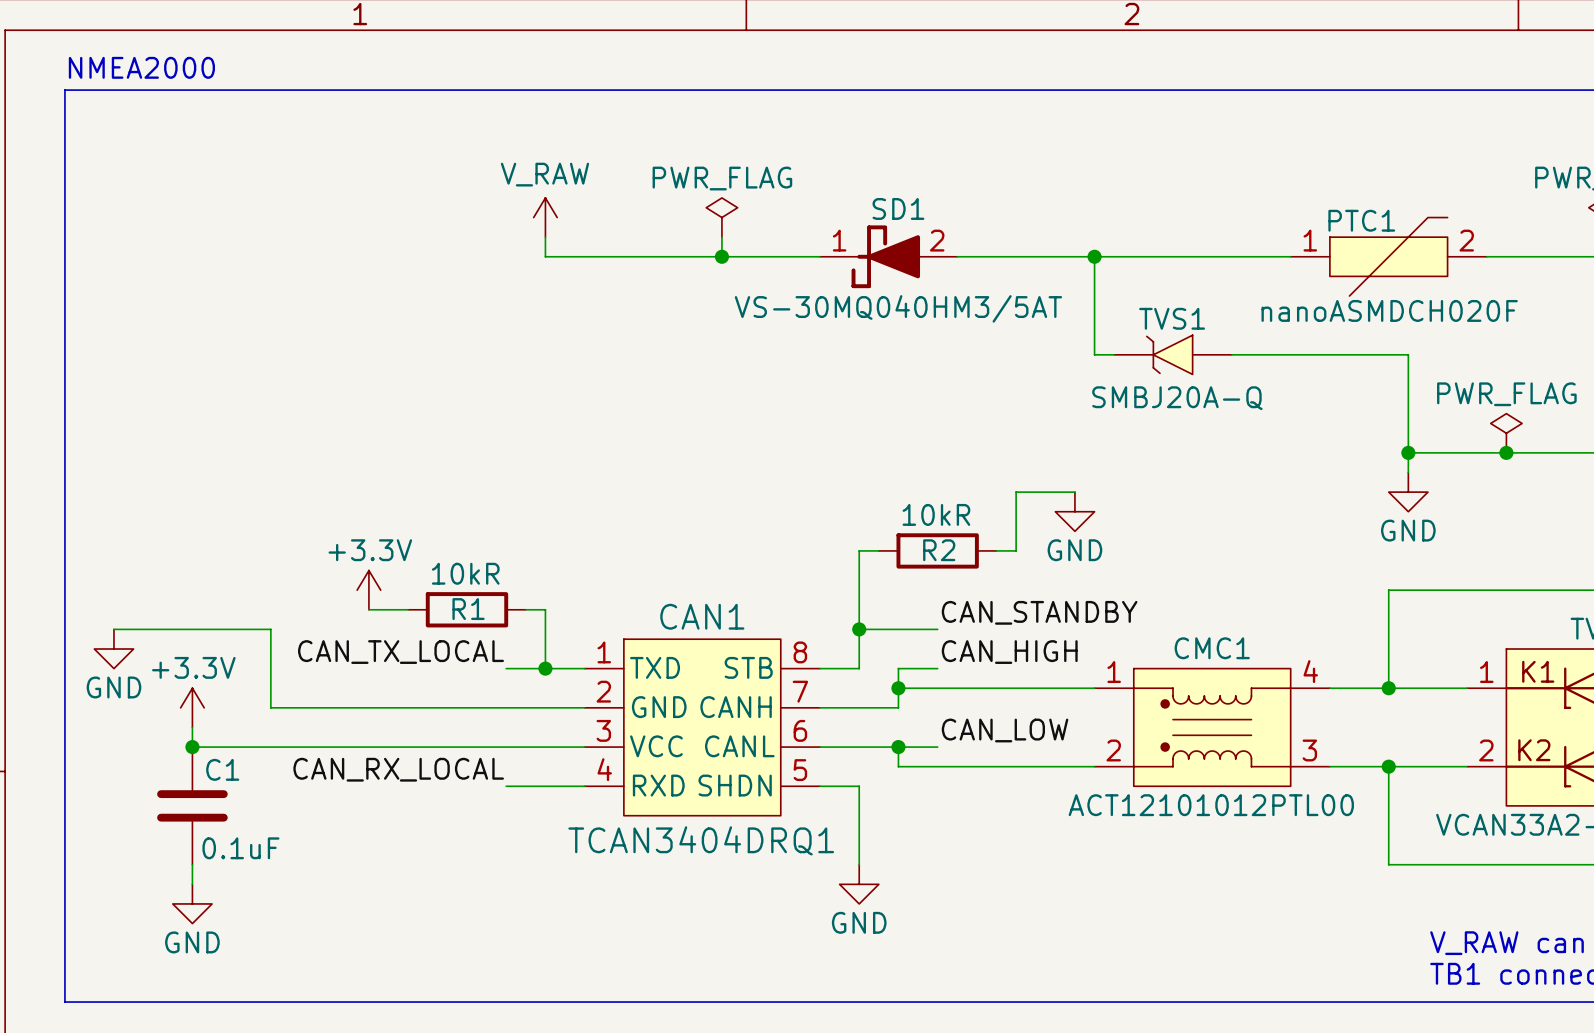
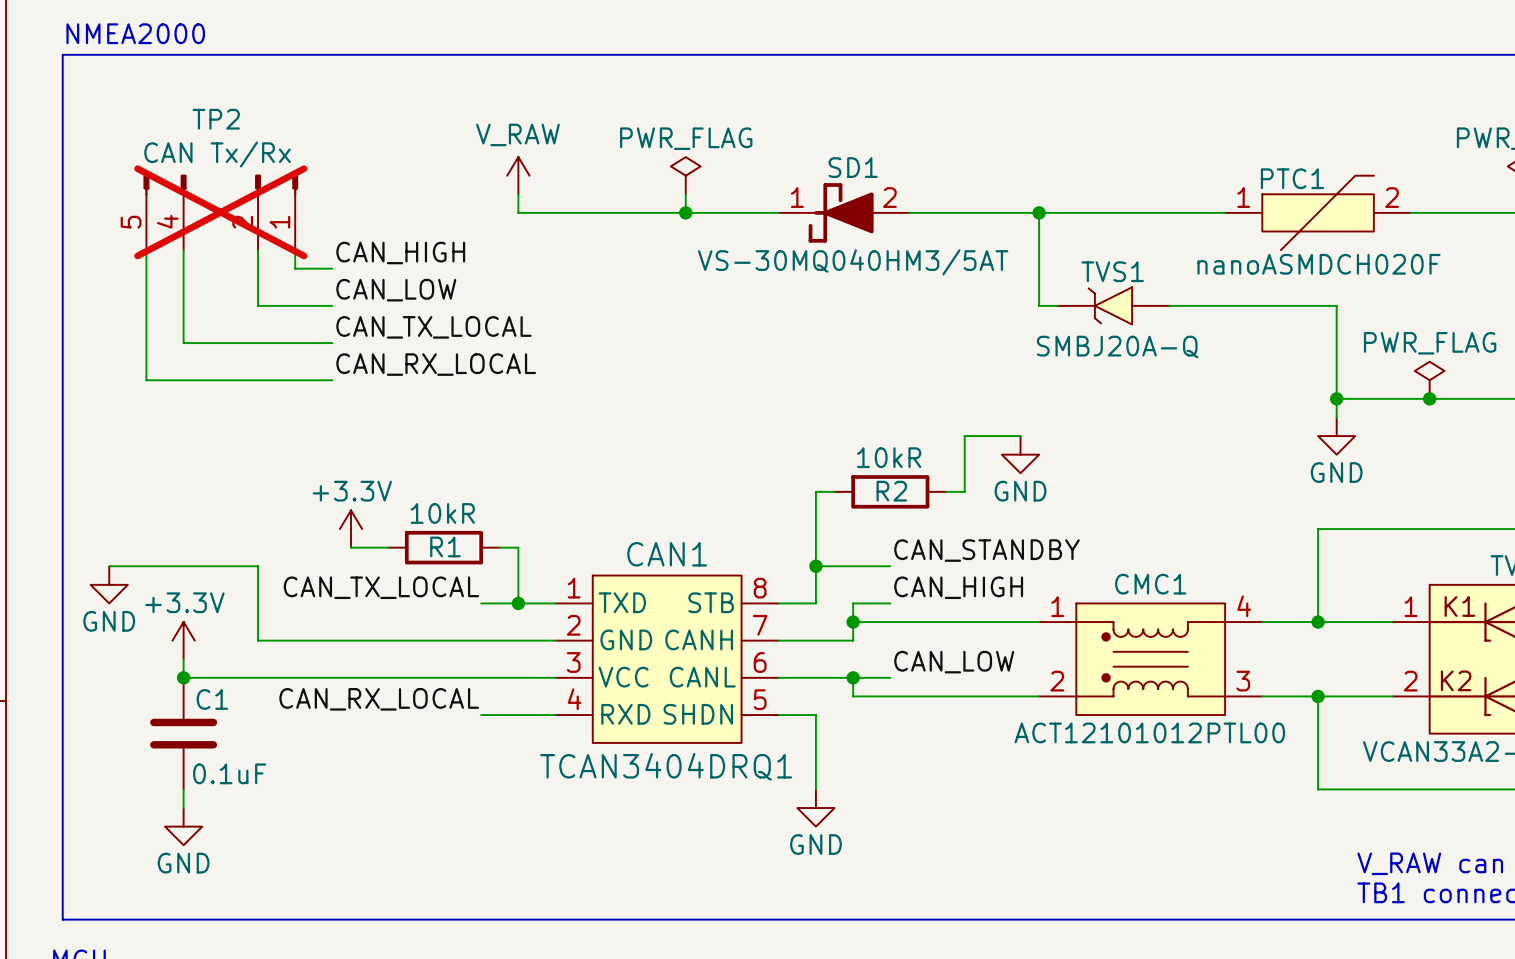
TP2: none -> CAN Tx/Rx (220, 212)
wire: none -> (146, 250) (146, 380) (332, 380)
wire: none -> (183, 250) (183, 343) (332, 343)
wire: none -> (258, 250) (258, 305) (332, 305)
wire: none -> (295, 250) (295, 268) (332, 268)
label: none -> CAN_HIGH (400, 252)
label: none -> CAN_LOW (396, 290)
label: none -> CAN_TX_LOCAL (433, 327)
label: none -> CAN_RX_LOCAL (436, 364)

